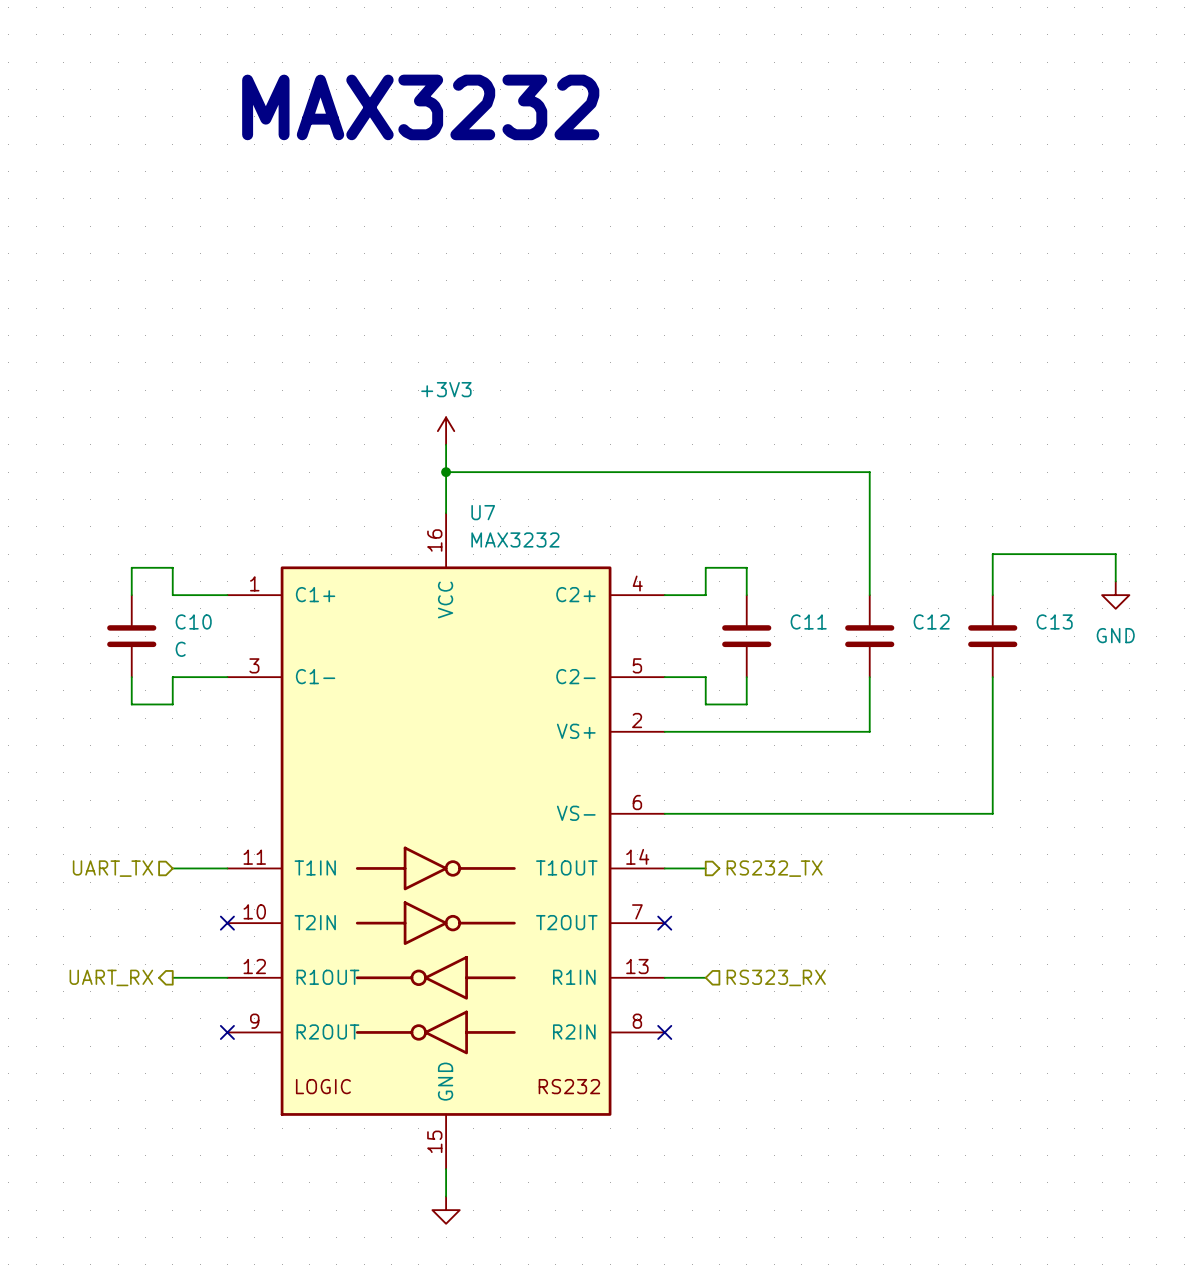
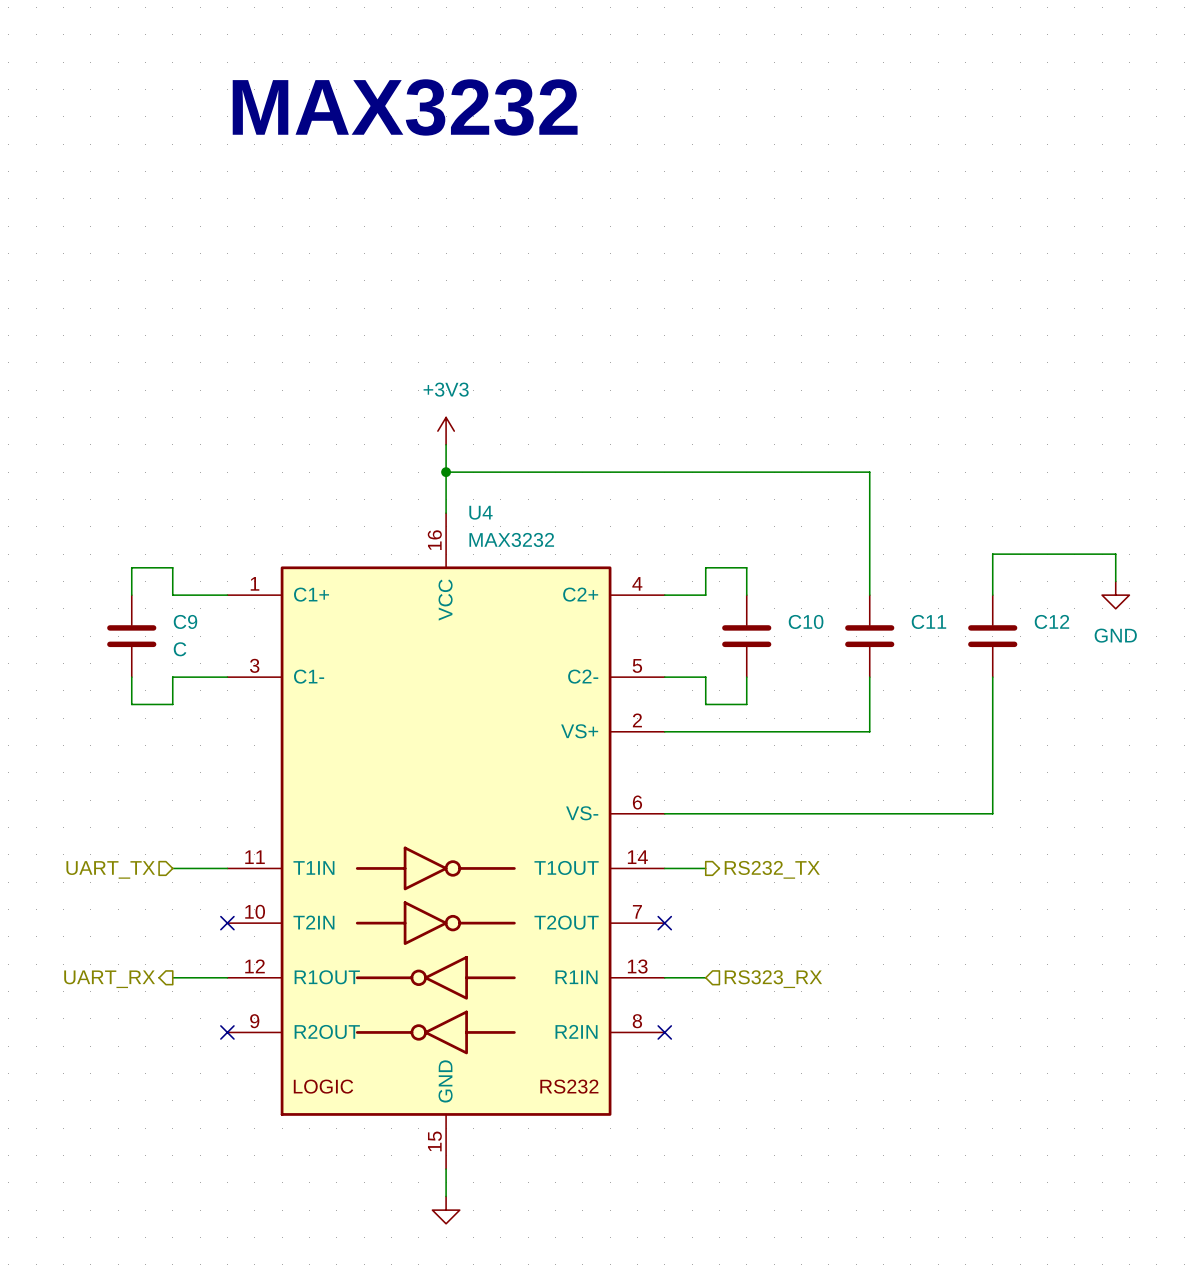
U7 name: U7 (483, 512) -> U4 (480, 512)
C10 name: C10 (193, 621) -> C9 (185, 621)
C11 name: C11 (808, 621) -> C10 (806, 621)
C12 name: C12 (931, 621) -> C11 (928, 621)
C13 name: C13 (1054, 621) -> C12 (1051, 621)

